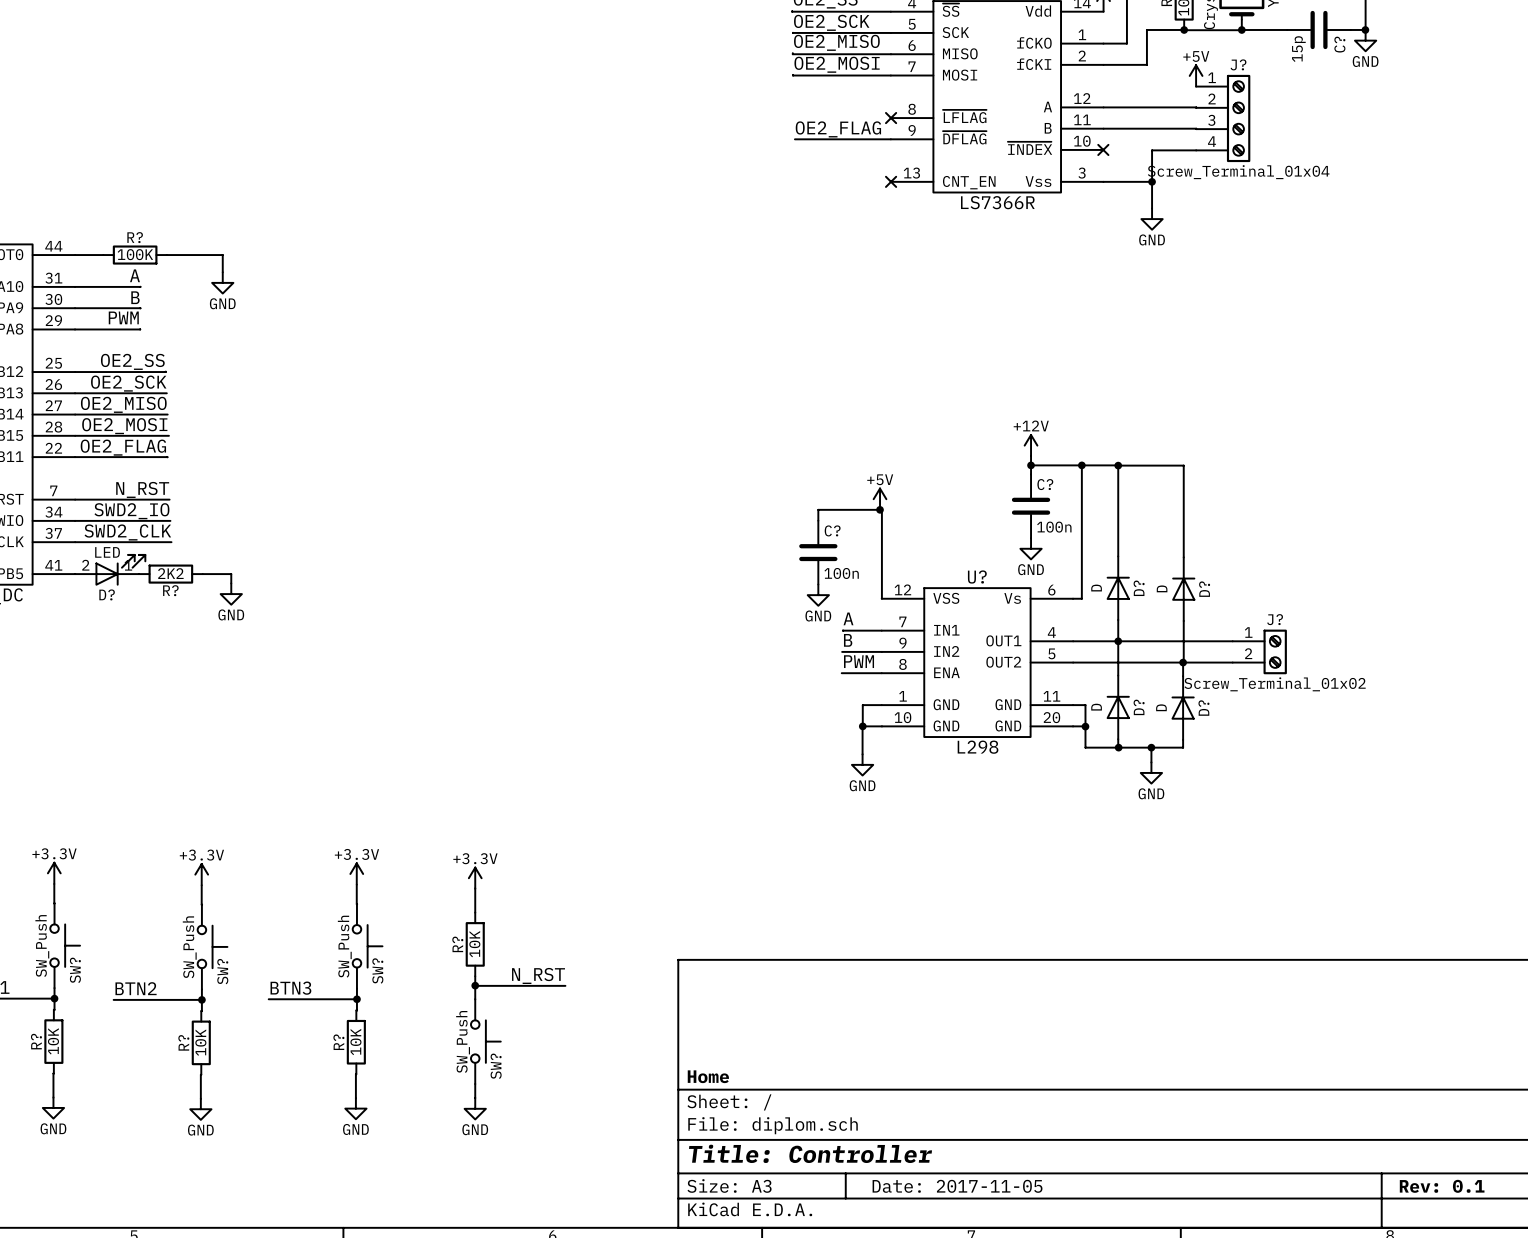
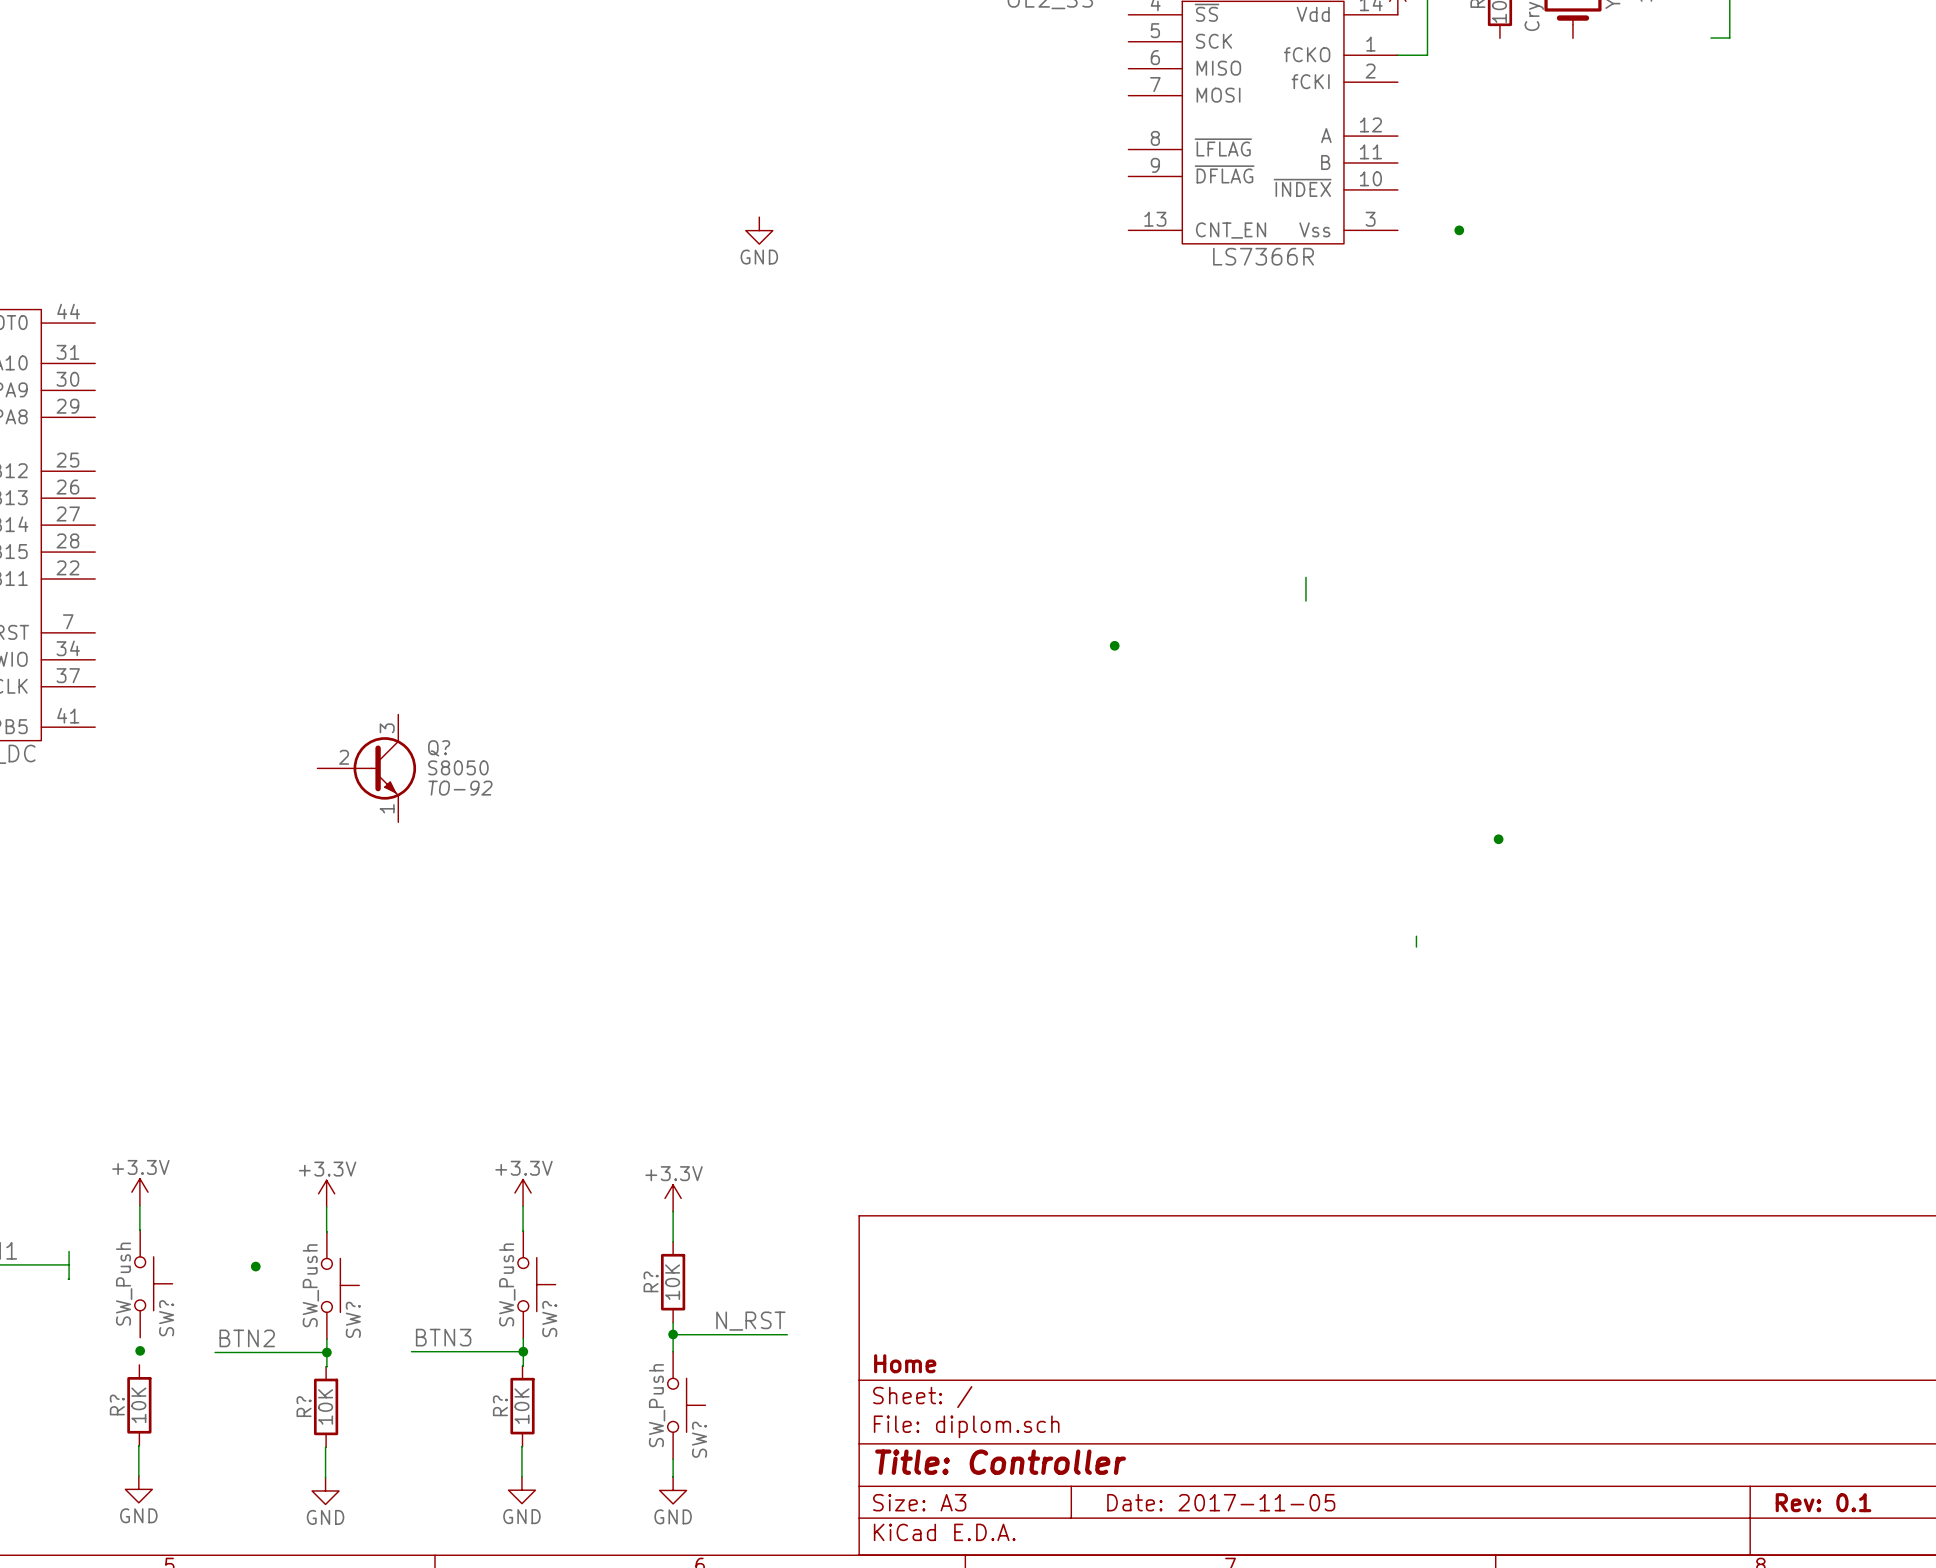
wire: (792, 11) (890, 11) -> none
label: OE2_SCK (831, 22) -> none
wire: (1184, 29) (1146, 29) (1146, 64) (1103, 64) -> none
junction: (1184, 29) -> none
wire: (1241, 29) (1287, 29) -> none
junction: (1241, 29) -> none
wire: (1242, 29) (1184, 30) -> none
C?: 15p (1319, 29) -> none
junction: (1365, 29) -> none
wire: (793, 32) (891, 32) -> none
power symbol: GND (1365, 40) -> none
label: OE2_MISO (836, 42) -> none
wire: (792, 53) (891, 54) -> none
label: OE2_MOSI (837, 64) -> none
wire: (793, 74) (890, 75) -> none
power symbol: +5V (1196, 75) -> none
wire: (1103, 107) (1196, 107) -> none
no-connect mark: (891, 118) -> none
J?: Screw_Terminal_01x04 (1223, 118) -> none
wire: (1103, 128) (1196, 129) -> none
label: OE2_FLAG (838, 129) -> none
wire: (794, 139) (890, 139) -> none
no-connect mark: (1103, 149) -> none
wire: (1196, 150) (1152, 150) (1152, 208) -> none
no-connect mark: (891, 181) -> none
wire: (1103, 181) (1152, 181) -> none
power symbol: none -> GND (759, 230)
power symbol: GND (1152, 219) -> none
wire: (75, 255) (103, 255) -> none
R?: 100K (135, 255) -> none
wire: (166, 255) (222, 255) (222, 272) -> none
label: A (134, 275) -> none
power symbol: GND (222, 282) -> none
wire: (140, 286) (74, 286) -> none
label: B (135, 297) -> none
wire: (74, 308) (140, 308) -> none
label: PWM (123, 317) -> none
wire: (140, 329) (74, 329) -> none
label: OE2_SS (132, 361) -> none
wire: (165, 371) (75, 372) -> none
label: OE2_SCK (128, 383) -> none
wire: (74, 393) (166, 393) -> none
label: OE2_MISO (123, 404) -> none
wire: (75, 414) (167, 414) -> none
label: OE2_MOSI (124, 426) -> none
wire: (75, 435) (168, 435) -> none
power symbol: +12V (1031, 445) -> none
label: OE2_FLAG (123, 447) -> none
wire: (74, 457) (167, 457) -> none
wire: (1031, 465) (1118, 465) (1118, 556) -> none
junction: (1031, 465) -> none
wire: (1081, 465) (1081, 598) (1072, 598) -> none
junction: (1081, 465) -> none
wire: (1118, 465) (1183, 465) (1183, 557) -> none
junction: (1118, 465) -> none
label: N_RST (142, 489) -> none
wire: (75, 499) (169, 499) -> none
power symbol: +5V (880, 499) -> none
C?: 100n (1031, 506) -> none
wire: (880, 509) (818, 509) (818, 520) -> none
wire: (880, 509) (881, 509) (881, 598) -> none
label: SWD2_IO (131, 511) -> none
wire: (74, 520) (170, 520) -> none
label: SWD2_CLK (127, 532) -> none
wire: (75, 542) (171, 542) -> none
power symbol: GND (1031, 548) -> none
C?: 100n (818, 552) -> none
D?: LED (110, 570) -> none
R?: 2K2 (170, 574) -> none
wire: (202, 574) (231, 574) (231, 583) -> none
D?: D (1118, 588) -> none
D?: D (1183, 589) -> none
power symbol: GND (231, 594) -> none
power symbol: GND (818, 595) -> none
Q?: none -> S8050 (366, 768)
label: A (848, 618) -> none
wire: (1118, 619) (1118, 675) -> none
wire: (1183, 620) (1183, 662) -> none
wire: (843, 630) (881, 630) -> none
label: B (848, 640) -> none
wire: (1073, 641) (1232, 641) -> none
junction: (1118, 641) -> none
wire: (842, 651) (881, 651) -> none
J?: Screw_Terminal_01x02 (1259, 651) -> none
label: PWM (859, 661) -> none
U?: L298 (977, 662) -> none
wire: (1073, 662) (1232, 662) -> none
wire: (1183, 662) (1183, 676) -> none
wire: (841, 673) (881, 673) -> none
wire: (881, 705) (862, 705) (862, 726) -> none
wire: (1072, 705) (1085, 705) (1085, 747) (1183, 747) (1183, 739) -> none
D?: D (1118, 707) -> none
D?: D (1183, 708) -> none
junction: (862, 726) -> none
wire: (882, 726) (862, 726) (862, 754) -> none
wire: (1072, 726) (1085, 726) -> none
junction: (1085, 726) -> none
junction: (1118, 747) -> none
wire: (1151, 747) (1151, 762) -> none
junction: (1151, 747) -> none
power symbol: GND (862, 764) -> none
power symbol: GND (1151, 772) -> none
power symbol: +3.3V (54, 873) -> none
power symbol: +3.3V (356, 873) -> none
power symbol: +3.3V (201, 874) -> none
power symbol: +3.3V (475, 878) -> none
wire: (54, 883) (54, 903) -> (139, 1205) (140, 1230)
wire: (356, 884) (357, 904) -> (523, 1206) (523, 1231)
wire: (201, 885) (202, 904) -> (326, 1207) (327, 1232)
wire: (475, 888) (475, 912) -> (673, 1211) (673, 1242)
power symbol: none -> +3.3V (139, 1192)
power symbol: none -> +3.3V (523, 1193)
power symbol: none -> +3.3V (326, 1193)
R? position: (475, 944) -> (673, 1282)
SW?: SW_Push (65, 945) -> none
SW?: SW_Push (212, 946) -> none
SW?: SW_Push (367, 946) -> none
power symbol: none -> +3.3V (673, 1198)
label position: N_RST (538, 975) -> N_RST (750, 1321)
wire: (475, 976) (475, 999) -> (673, 1322) (673, 1351)
wire: (475, 985) (565, 985) -> (673, 1334) (787, 1334)
junction: (475, 985) -> none
label position: BTN2 (136, 988) -> BTN2 (247, 1338)
label position: BTN3 (290, 988) -> BTN3 (443, 1337)
wire: (356, 988) (356, 1010) -> (523, 1338) (522, 1365)
wire: (201, 989) (201, 1011) -> (326, 1339) (326, 1366)
junction: (54, 998) -> none
wire: (113, 999) (202, 999) -> (215, 1352) (327, 1352)
wire: (268, 999) (357, 999) -> (411, 1351) (523, 1351)
junction: (356, 999) -> none
SW?: none -> SW_Push (153, 1283)
SW?: none -> SW_Push (340, 1285)
SW?: none -> SW_Push (536, 1284)
R?: 10K (53, 1041) -> none
SW?: SW_Push (485, 1041) -> none
R?: 10K (201, 1042) -> none
R?: 10K (356, 1042) -> none
junction: none -> (673, 1334)
junction: none -> (140, 1350)
junction: none -> (326, 1352)
junction: none -> (523, 1351)
wire: (53, 1073) (53, 1097) -> (139, 1445) (138, 1476)
wire: (201, 1074) (200, 1099) -> (326, 1447) (325, 1478)
wire: (356, 1074) (355, 1098) -> (522, 1446) (521, 1477)
wire: (475, 1083) (475, 1098) -> (673, 1458) (672, 1476)
power symbol: GND (53, 1107) -> none
power symbol: GND (355, 1108) -> none
power symbol: GND (475, 1108) -> none
R?: none -> 10K (139, 1405)
power symbol: GND (200, 1109) -> none
SW?: none -> SW_Push (686, 1405)
R?: none -> 10K (326, 1406)
R?: none -> 10K (522, 1406)
power symbol: none -> GND (138, 1489)
power symbol: none -> GND (521, 1490)
power symbol: none -> GND (673, 1490)
power symbol: none -> GND (325, 1490)

